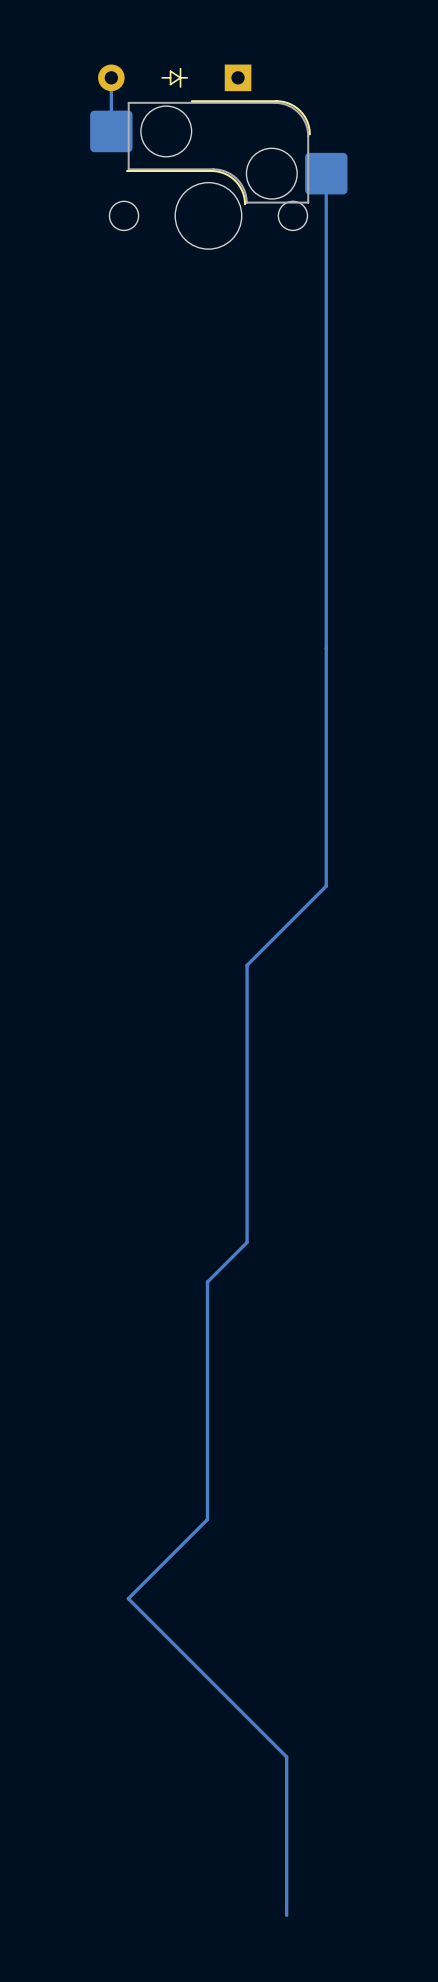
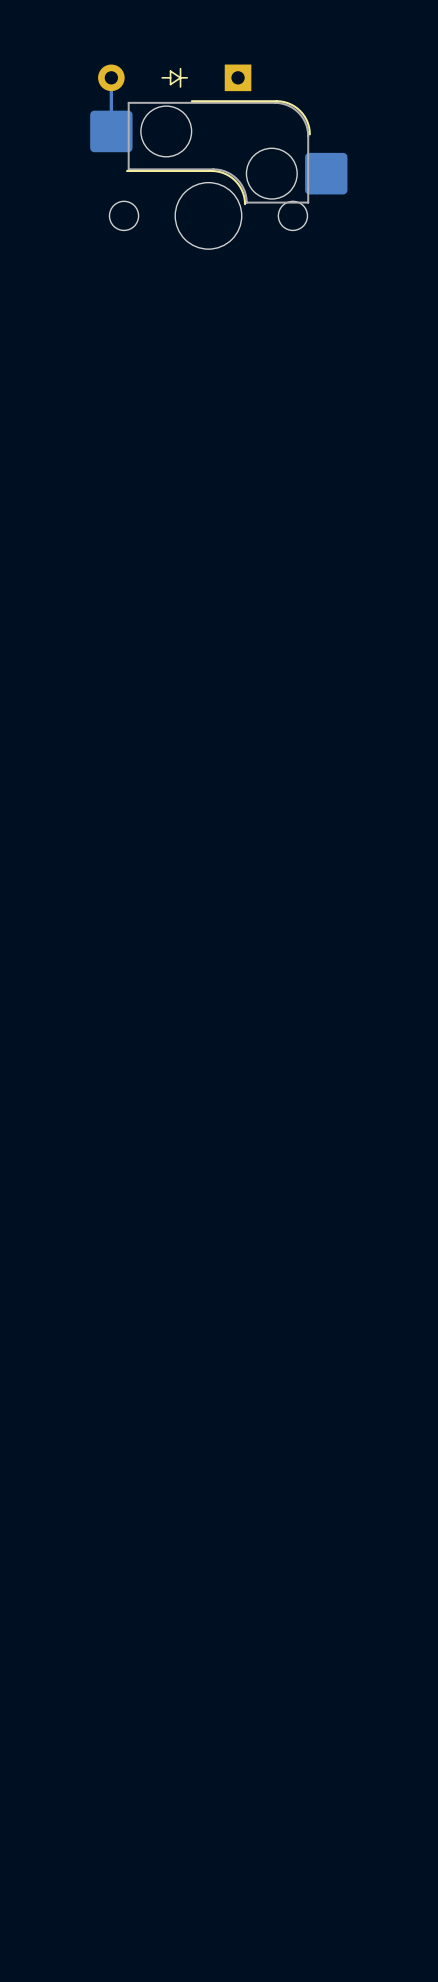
track: (326, 173) (326, 886) (247, 965) (247, 1242) (207, 1282) (207, 1519) (128, 1598) (286, 1757) (286, 1915) -> none

